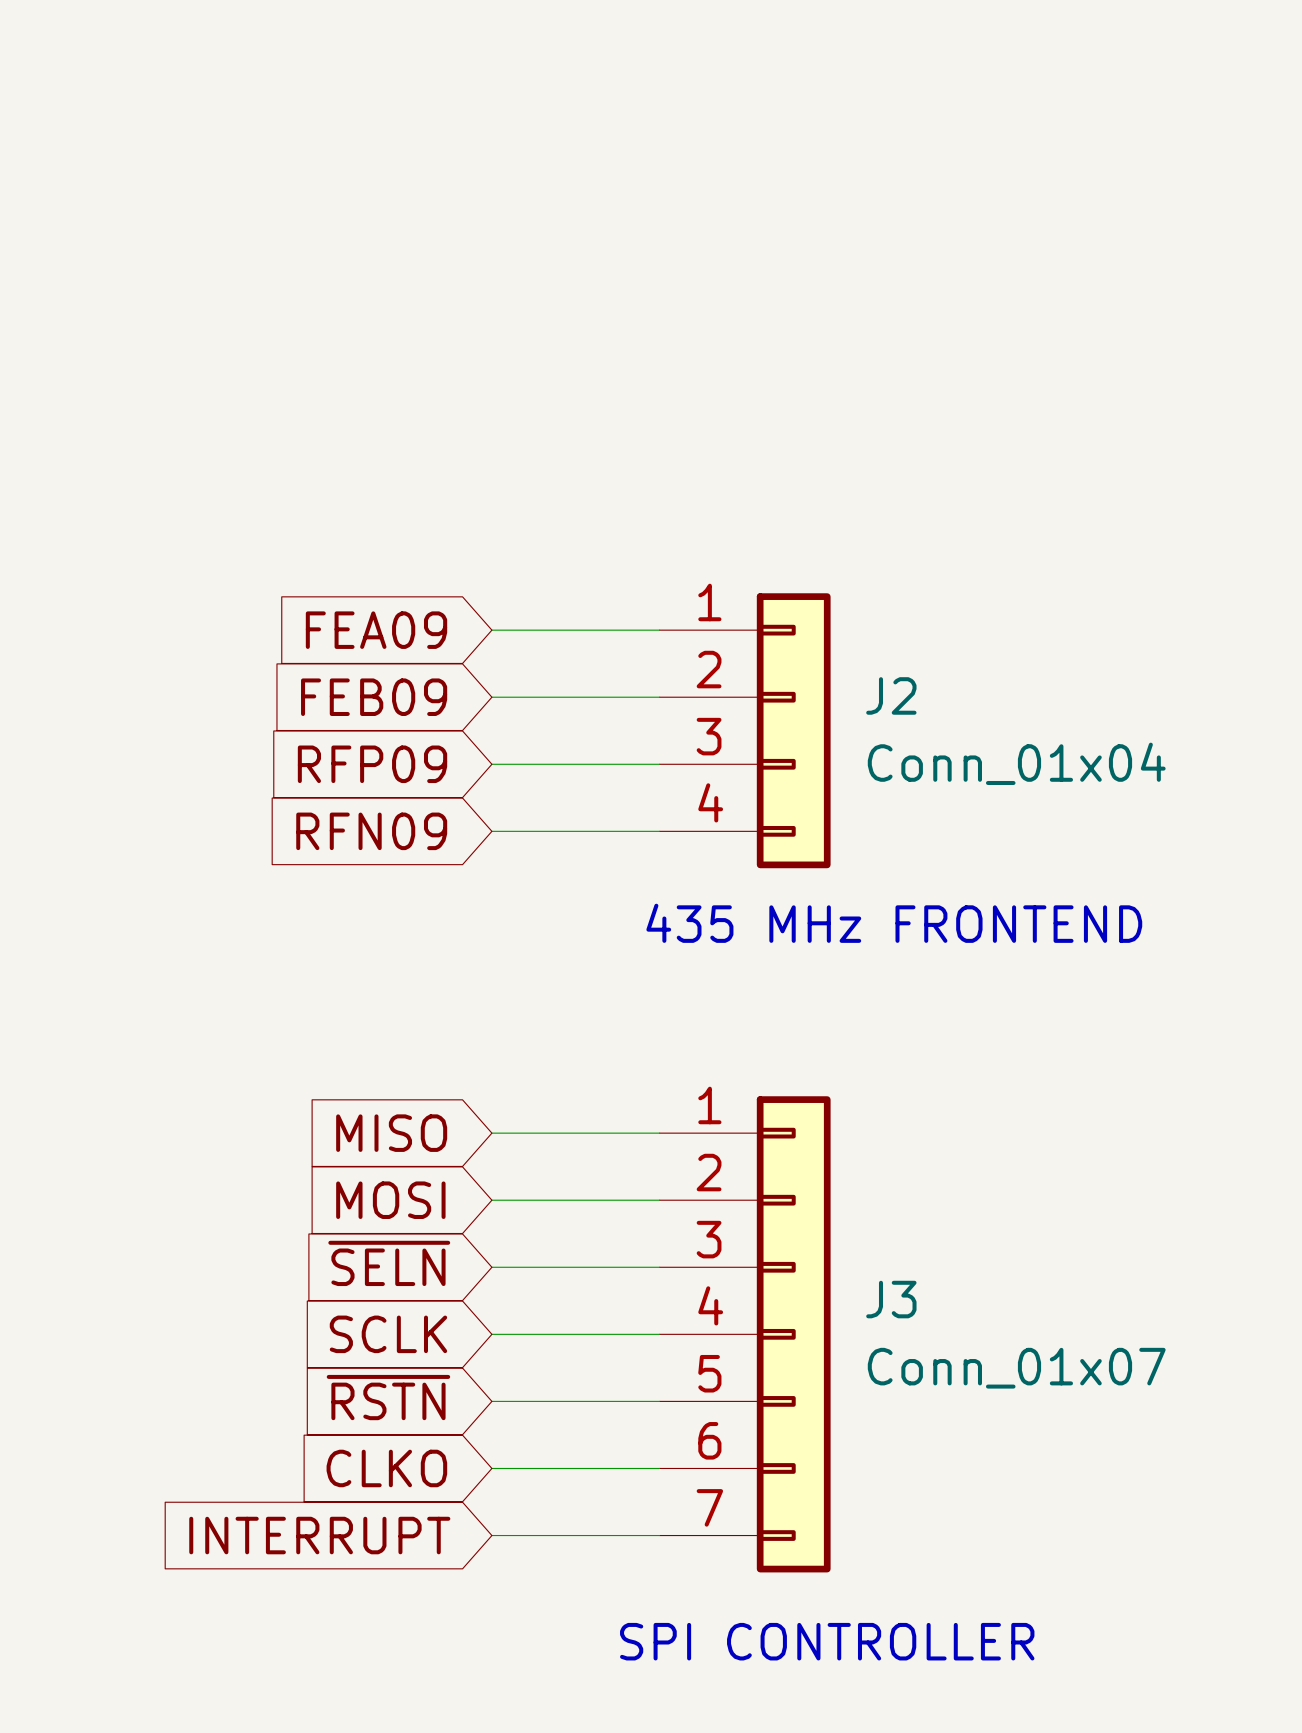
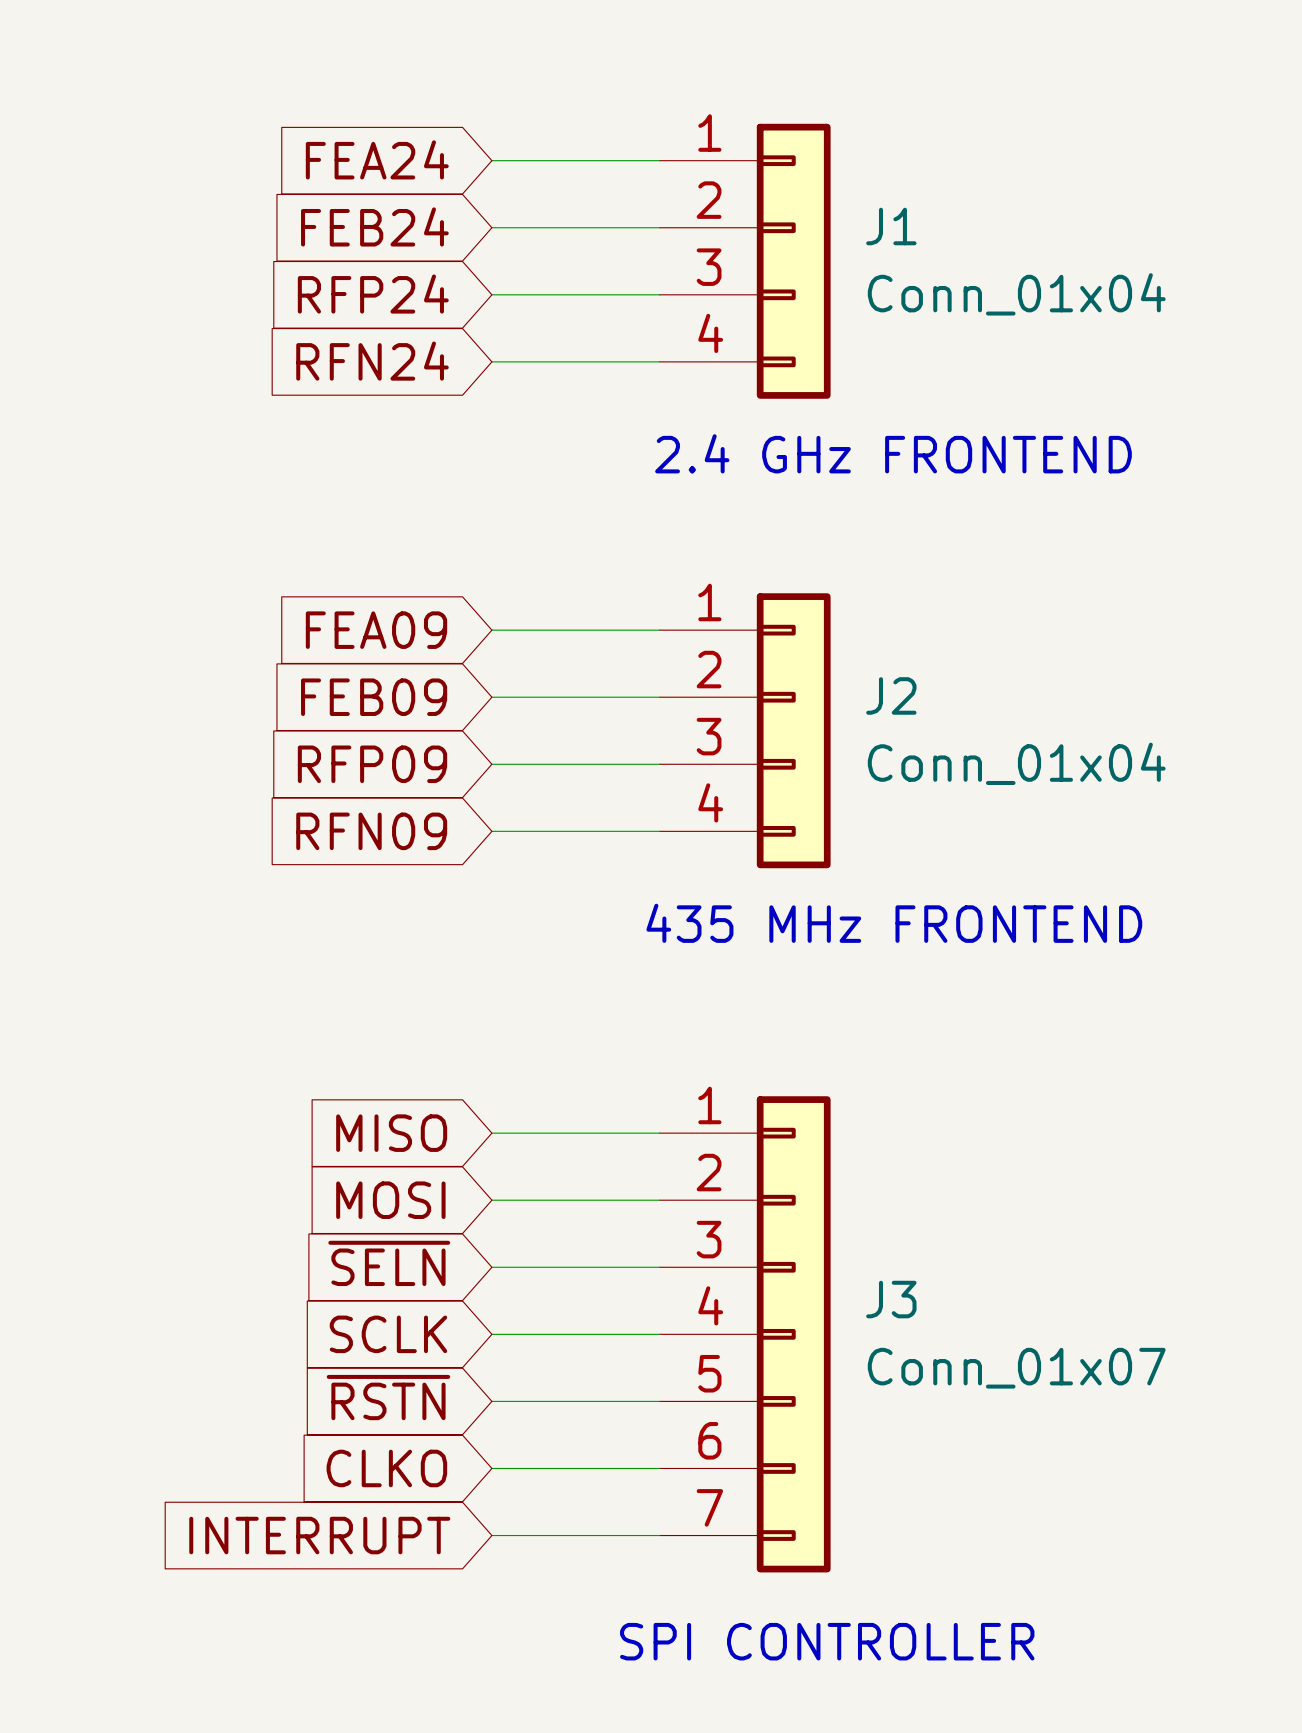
global label: none -> FEA24 (377, 159)
wire: none -> (491, 160) (659, 160)
global label: none -> FEB24 (374, 226)
wire: none -> (491, 227) (659, 227)
J1: none -> Conn_01x04 (745, 261)
global label: none -> RFP24 (373, 294)
wire: none -> (491, 294) (659, 294)
global label: none -> RFN24 (372, 361)
wire: none -> (491, 361) (659, 361)
text: none -> 2.4 GHz FRONTEND (893, 453)

